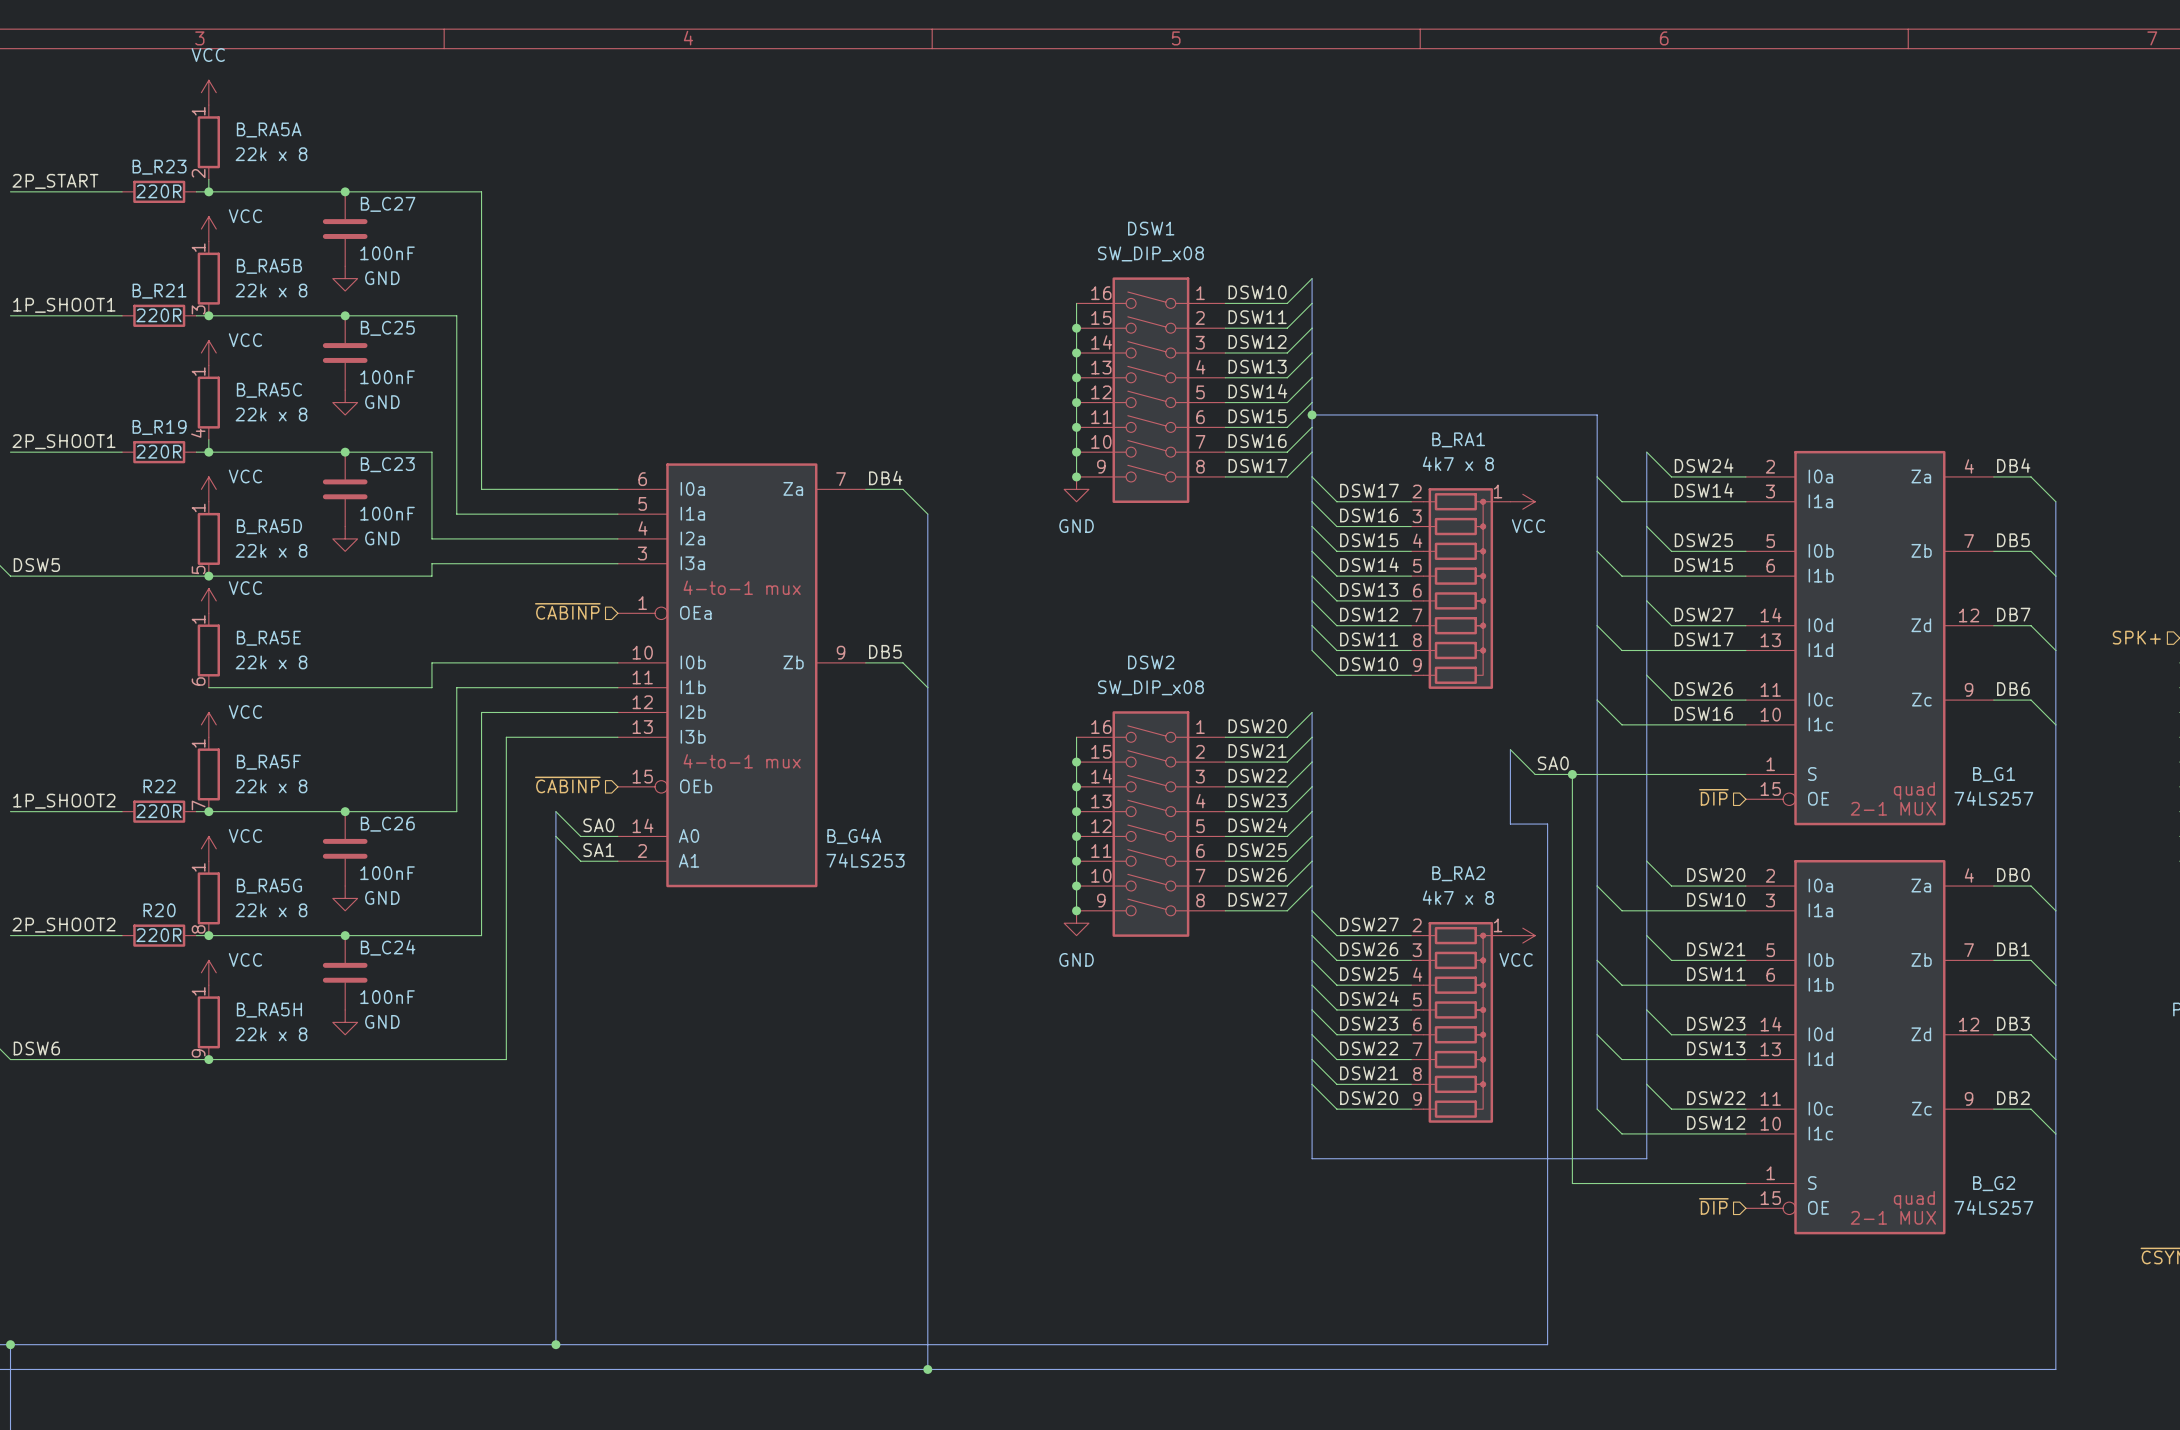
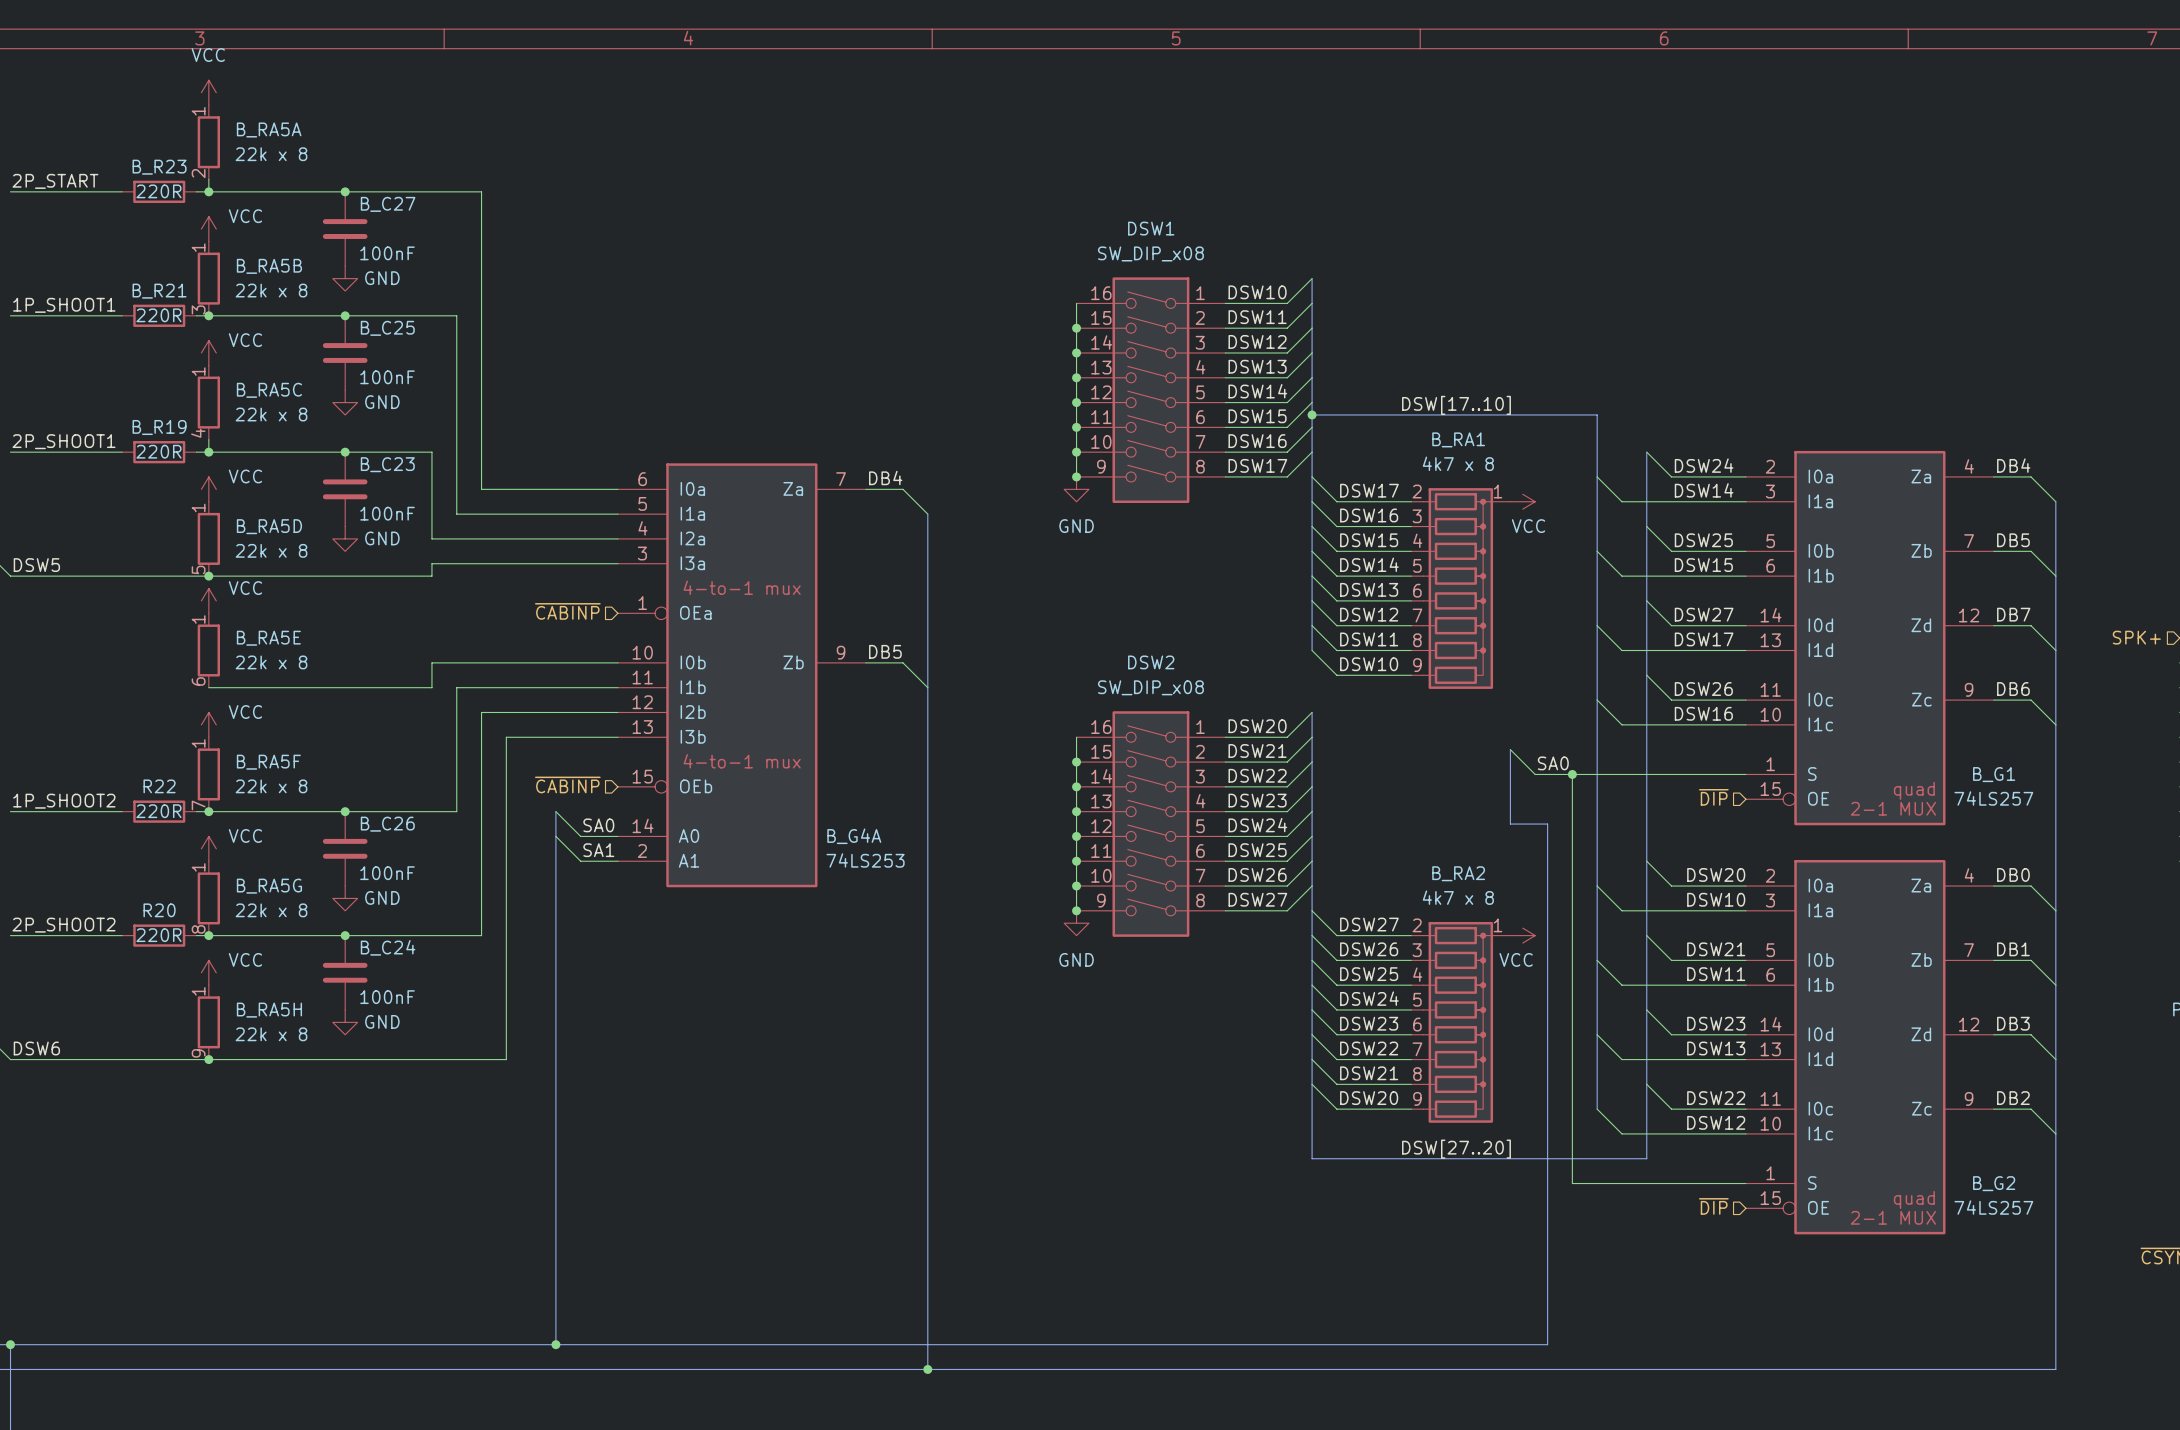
label: none -> DSW[17..10] (1456, 405)
label: none -> DSW[27..20] (1456, 1149)

